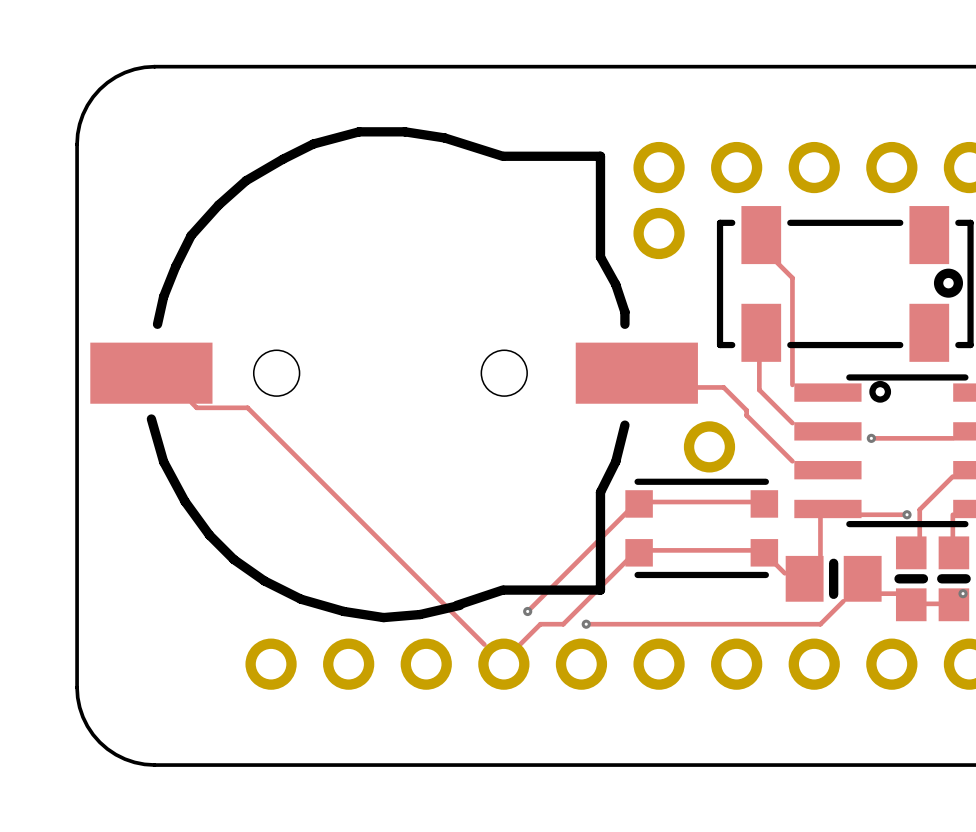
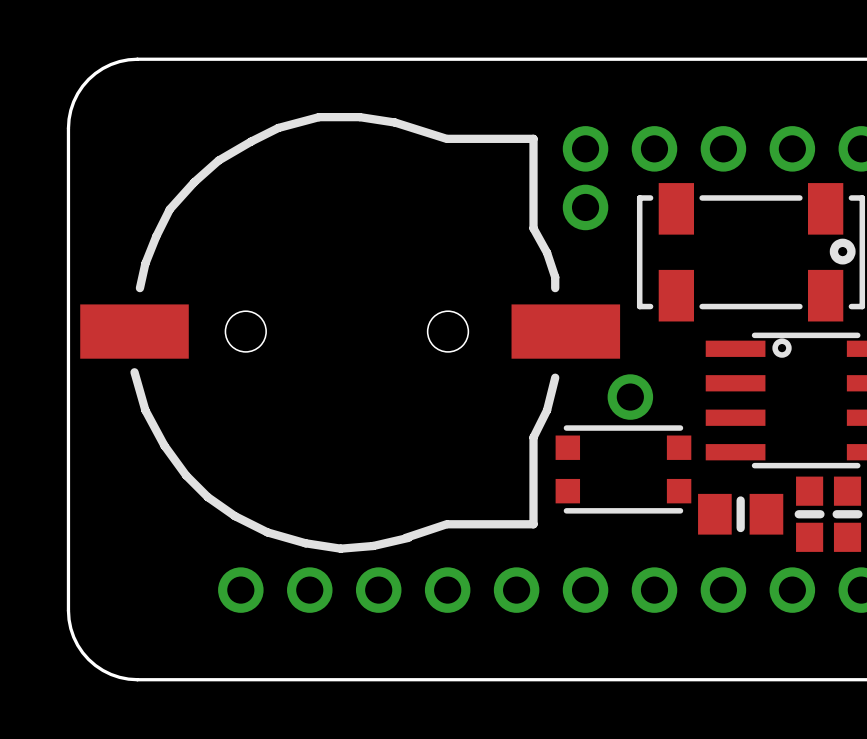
track: (777, 262) (792, 277) (792, 384) -> none
track: (759, 359) (759, 389) (792, 423) -> none
track: (695, 387) (723, 387) (746, 410) (746, 415) (792, 461) -> none
track: (191, 402) (196, 407) (247, 407) (484, 644) -> none
track: (871, 438) (952, 438) -> none
via: (871, 438) -> none
track: (952, 476) (919, 509) (919, 540) -> none
track: (644, 502) (754, 502) -> none
track: (629, 509) (527, 611) -> none
track: (820, 514) (820, 555) -> none
track: (858, 514) (907, 514) -> none
via: (907, 514) -> none
track: (952, 514) (952, 540) -> none
track: (644, 550) (754, 550) -> none
track: (629, 558) (563, 624) (540, 624) (520, 644) -> none
track: (769, 558) (784, 573) -> none
track: (879, 593) (899, 593) -> none
via: (963, 593) -> none
track: (843, 601) (820, 624) (586, 624) -> none
track: (919, 603) (942, 603) -> none
via: (527, 611) -> none
via: (586, 624) -> none

